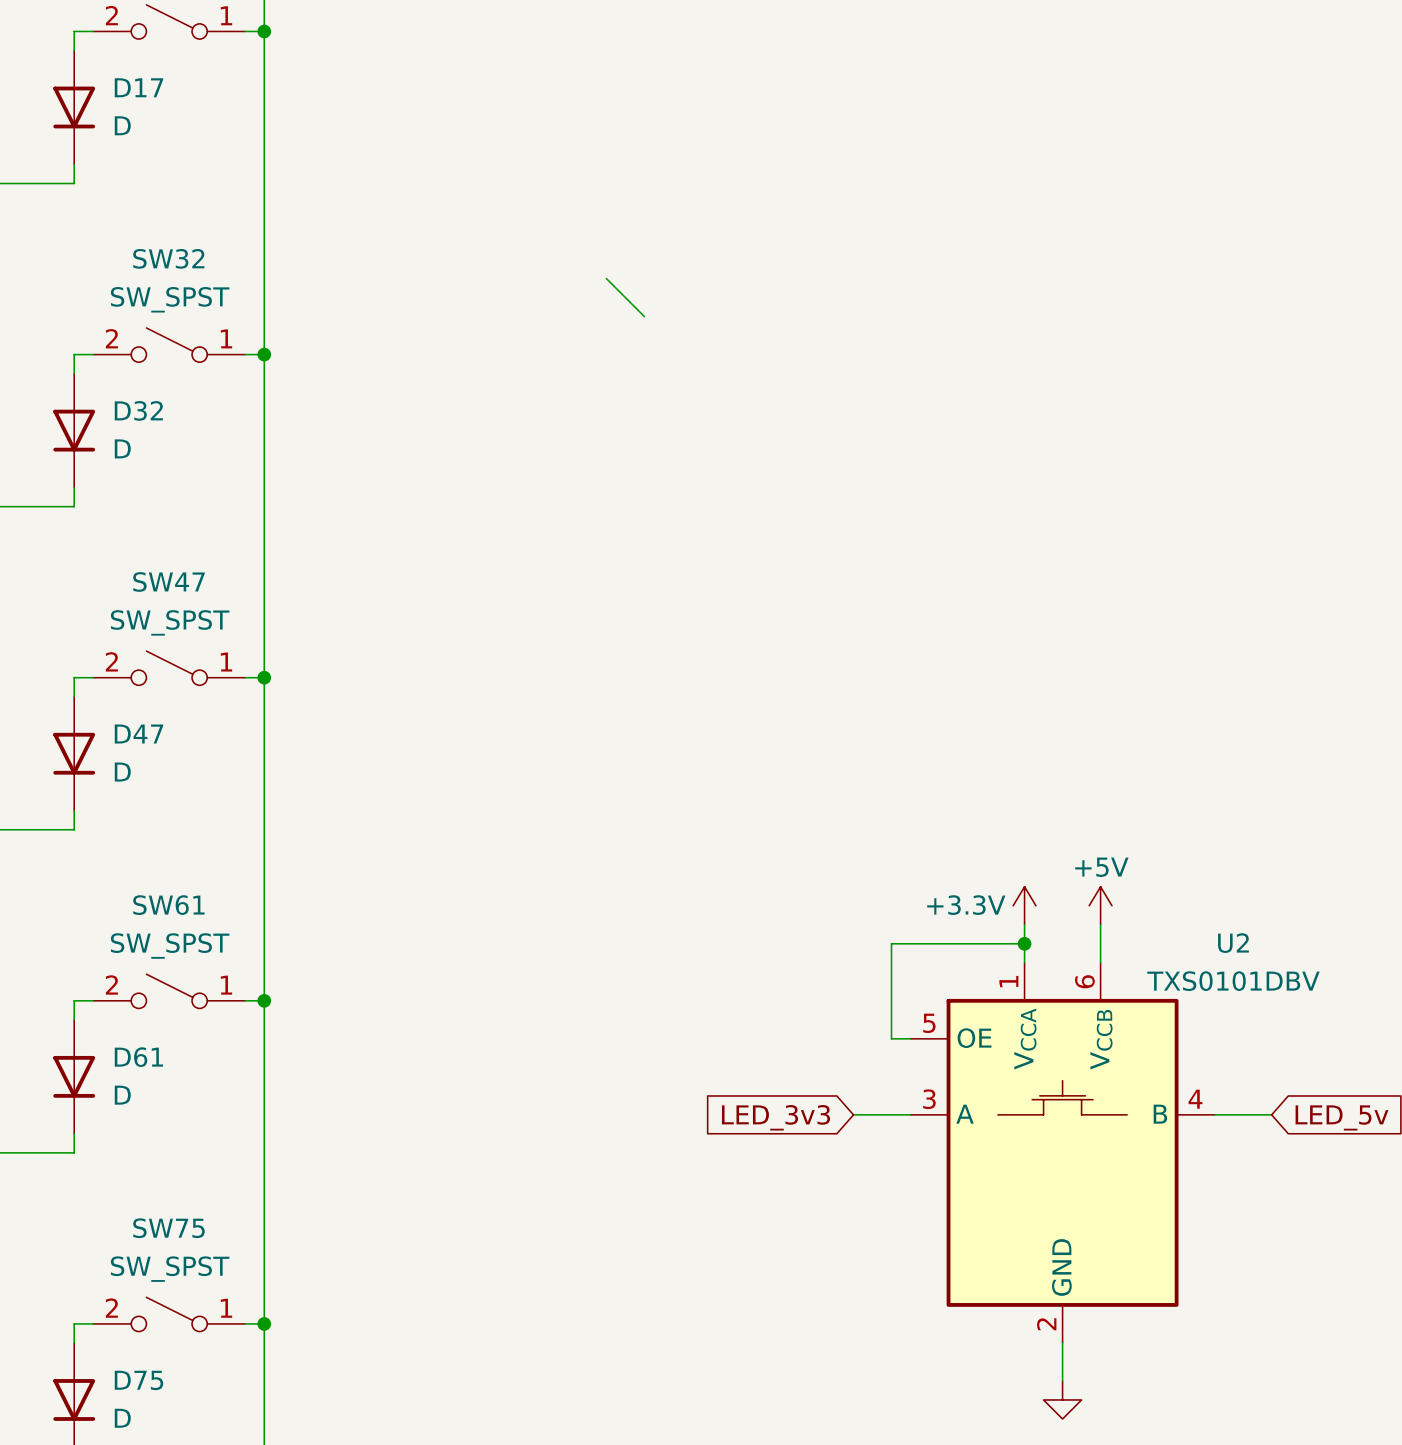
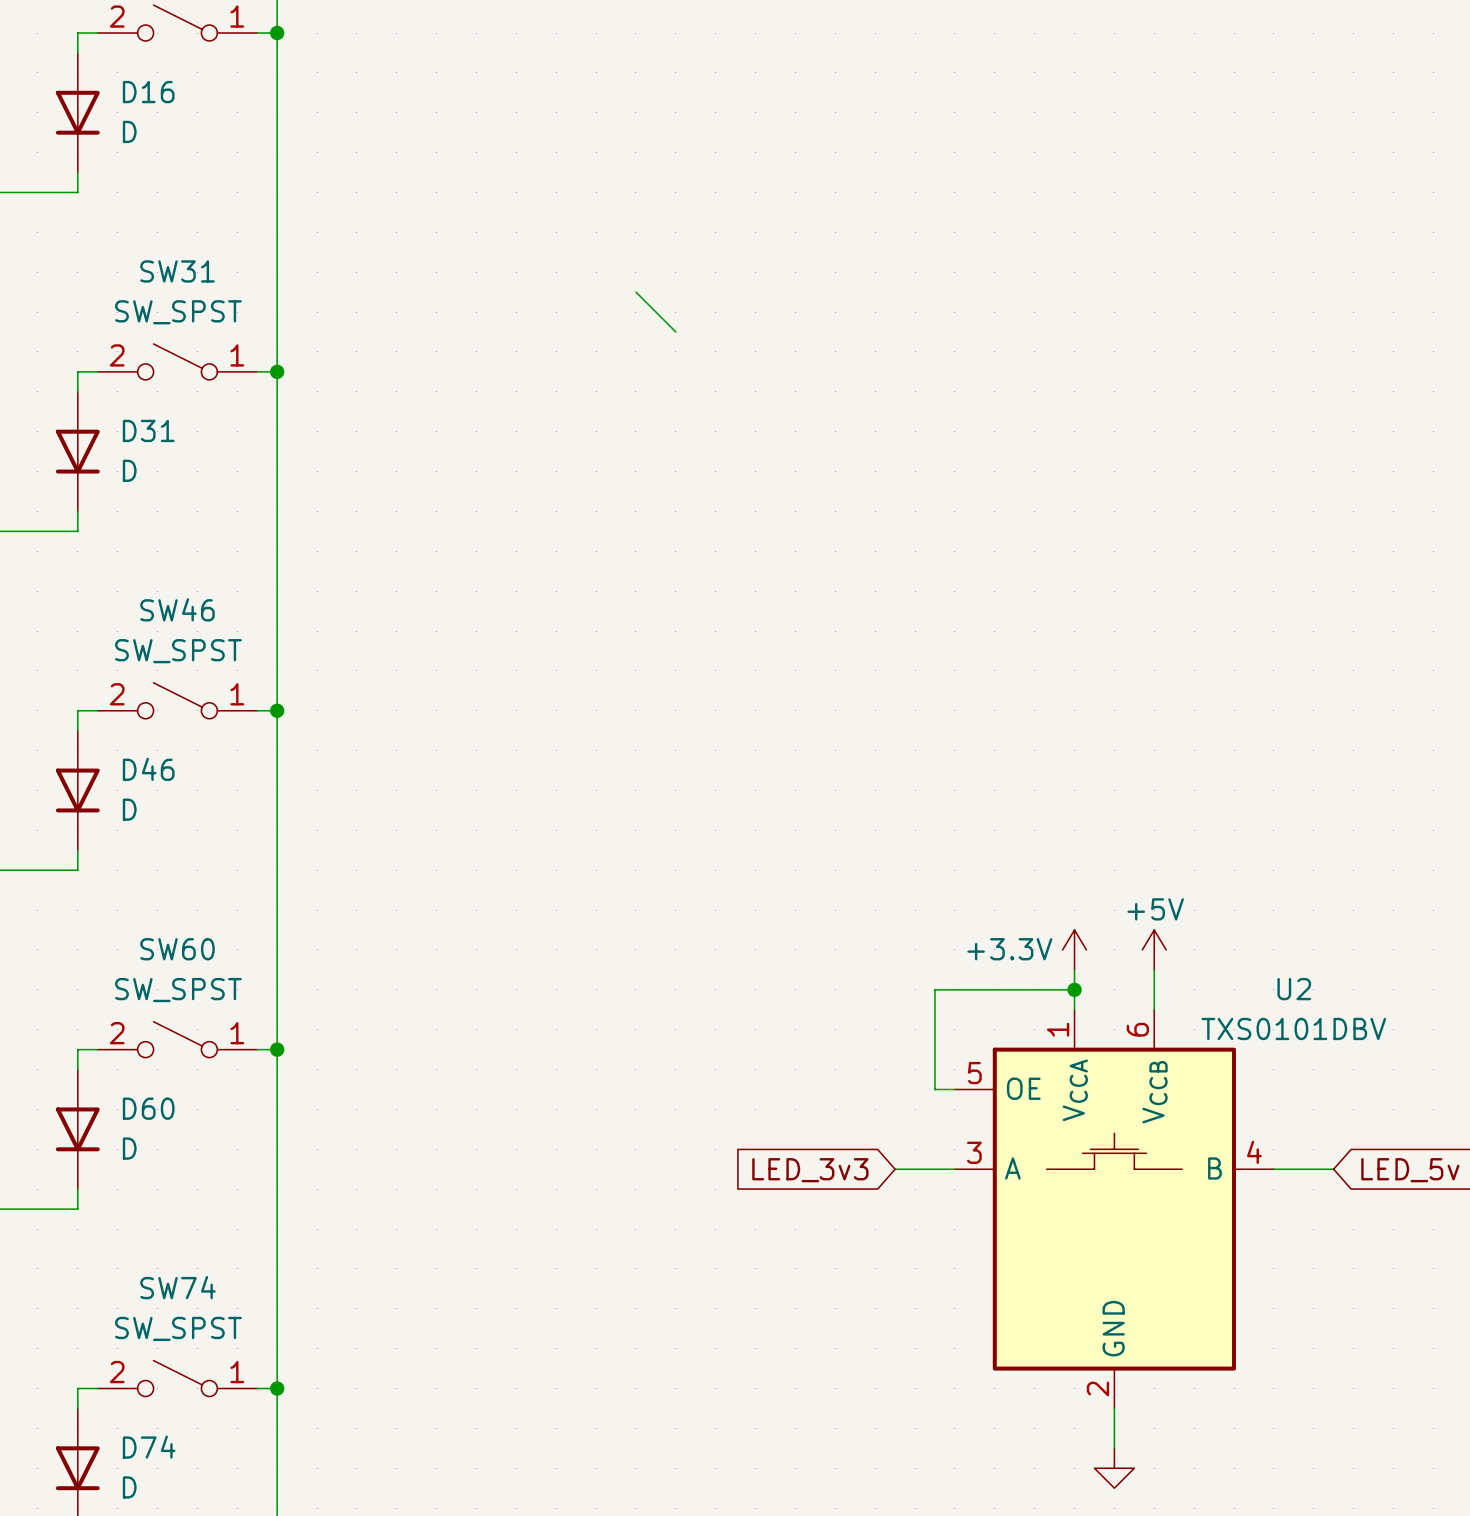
D17 name: D17 (139, 87) -> D16 (148, 92)
SW32 name: SW32 (168, 258) -> SW31 (177, 271)
D32 name: D32 (138, 410) -> D31 (148, 430)
SW47 name: SW47 (168, 581) -> SW46 (177, 609)
D47 name: D47 (139, 734) -> D46 (148, 769)
SW61 name: SW61 (168, 905) -> SW60 (177, 949)
D61 name: D61 (138, 1057) -> D60 (148, 1108)
SW75 name: SW75 (168, 1228) -> SW74 (177, 1287)
D75 name: D75 (138, 1380) -> D74 (149, 1447)

